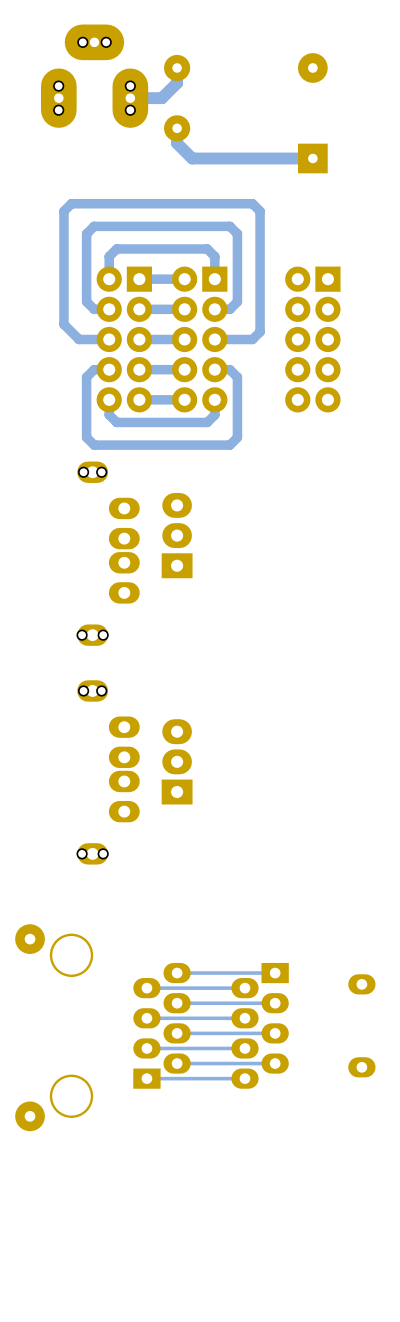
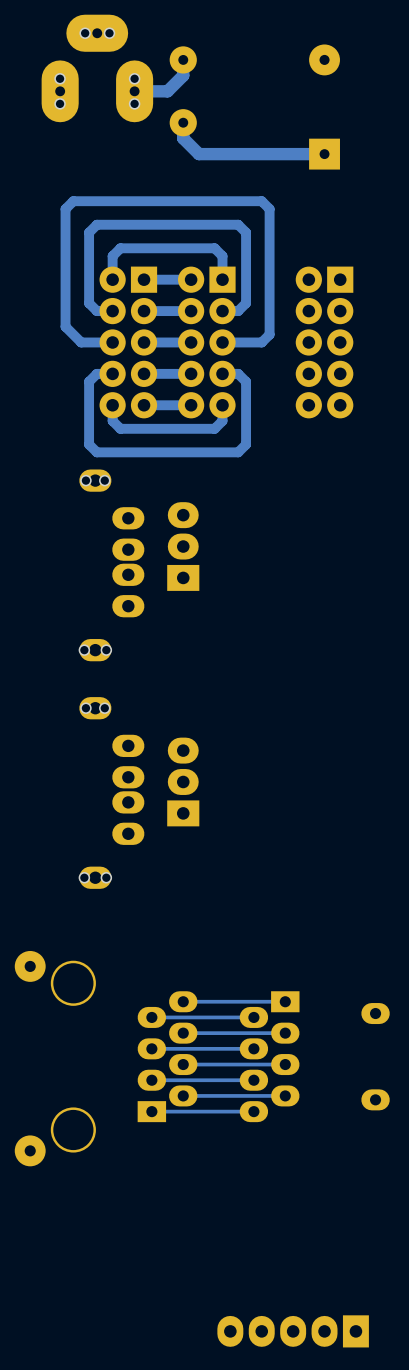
part: none -> (293, 1331)

